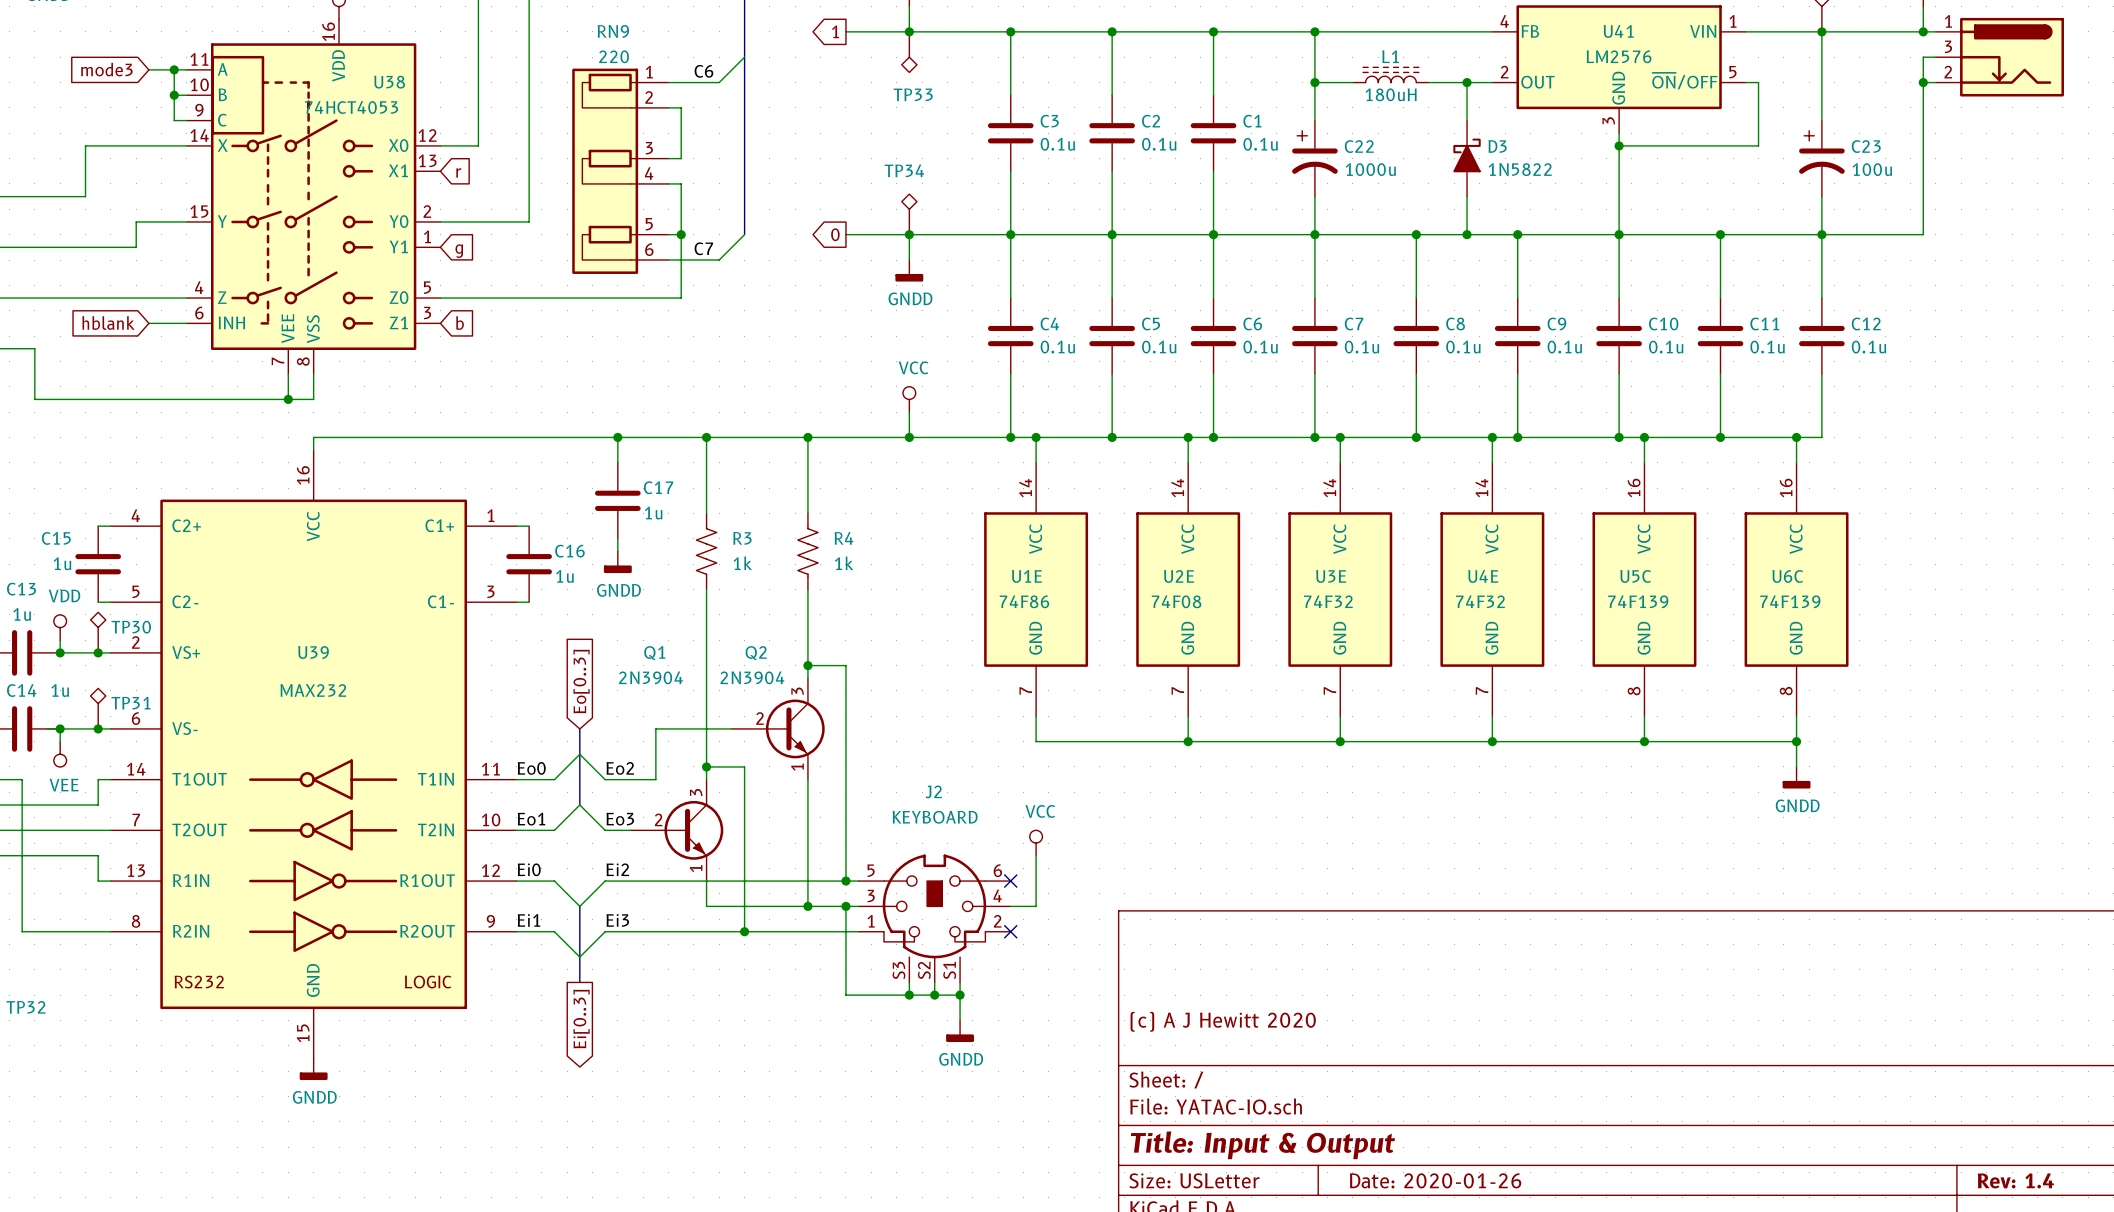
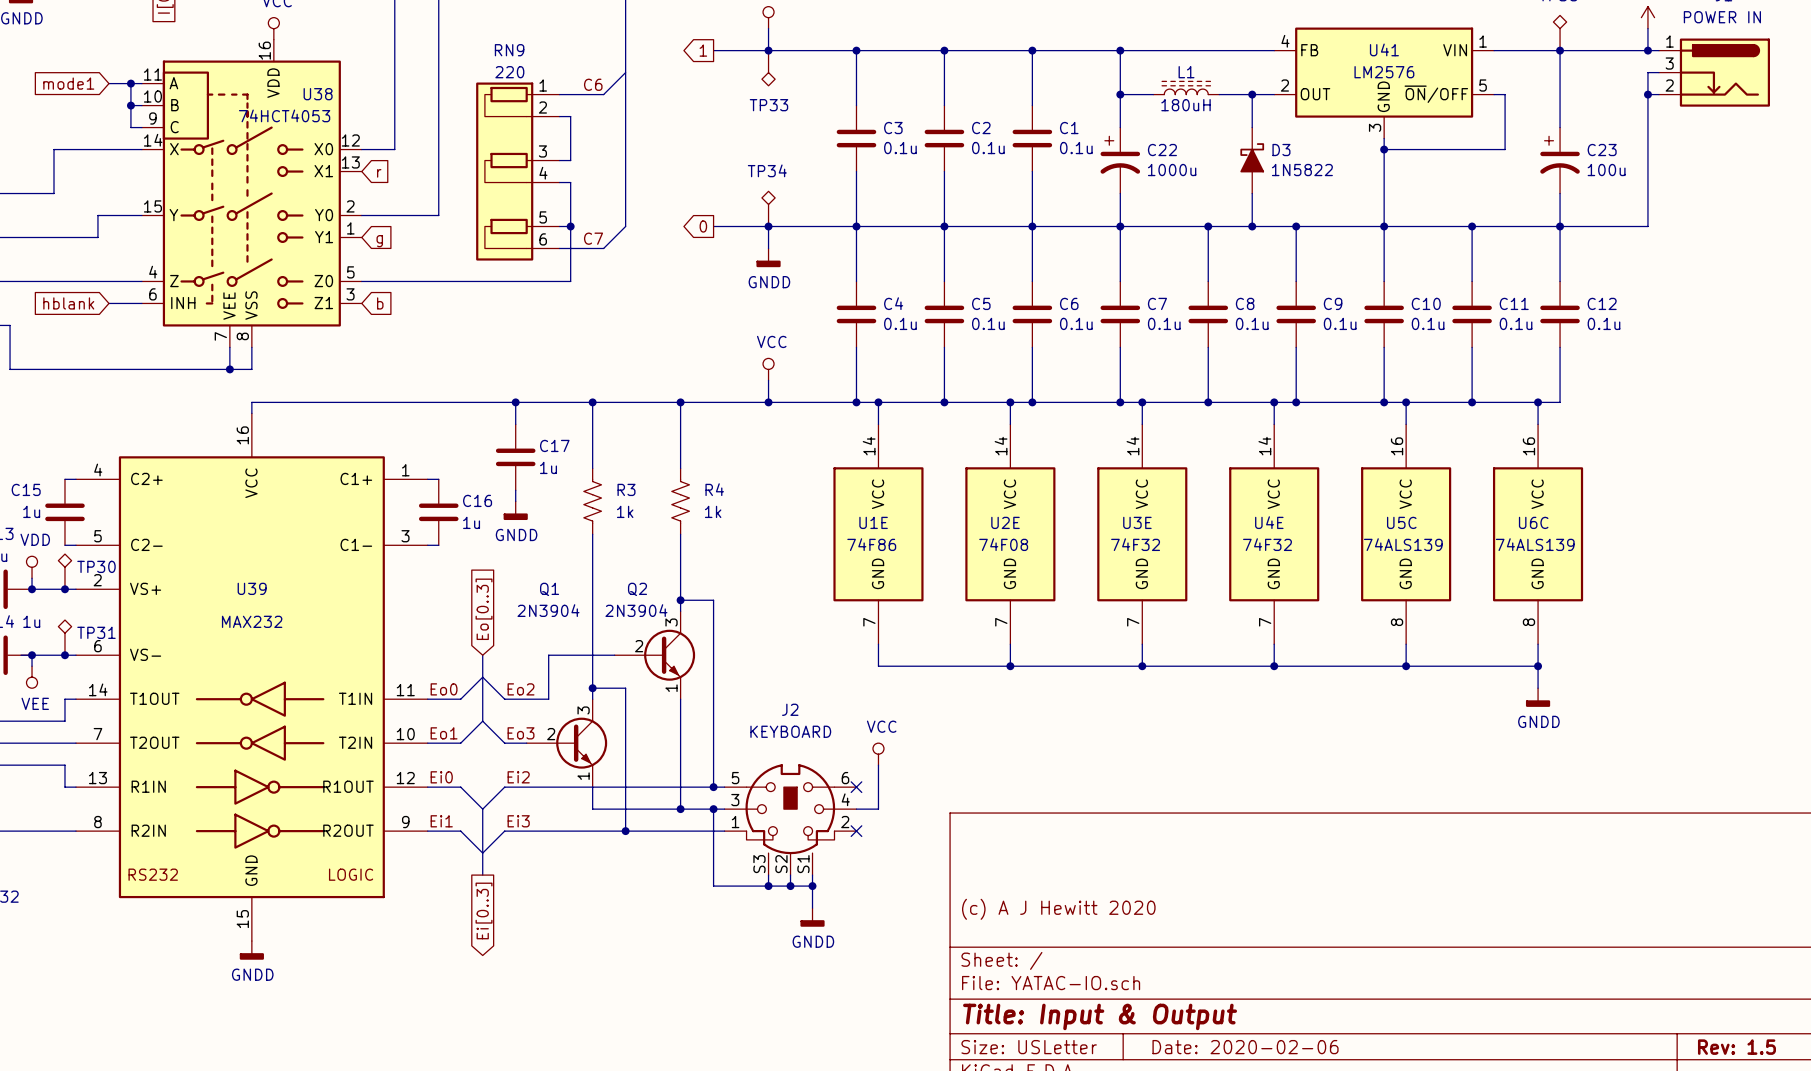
global label: mode3 (106, 69) -> mode1 (68, 83)
U5C value: 74F139 (1638, 601) -> 74ALS139 (1403, 544)
U6C value: 74F139 (1790, 601) -> 74ALS139 (1535, 544)
title block: Date: 2020-01-26 (1435, 1180) -> Date: 2020-02-06 (1245, 1047)
title block: Rev: 1.4 (2015, 1180) -> Rev: 1.5 (1736, 1047)

